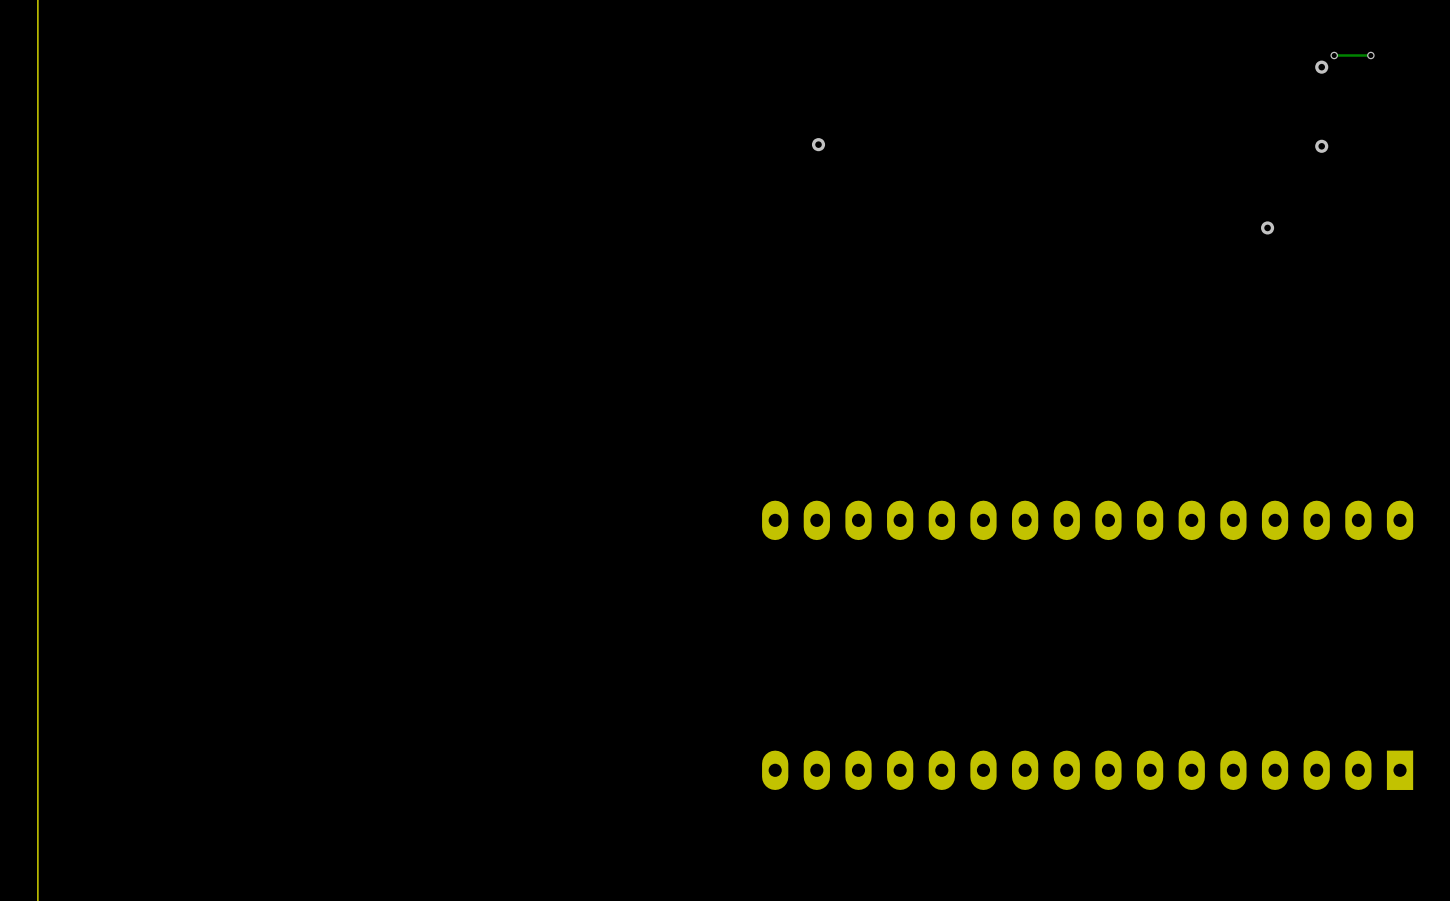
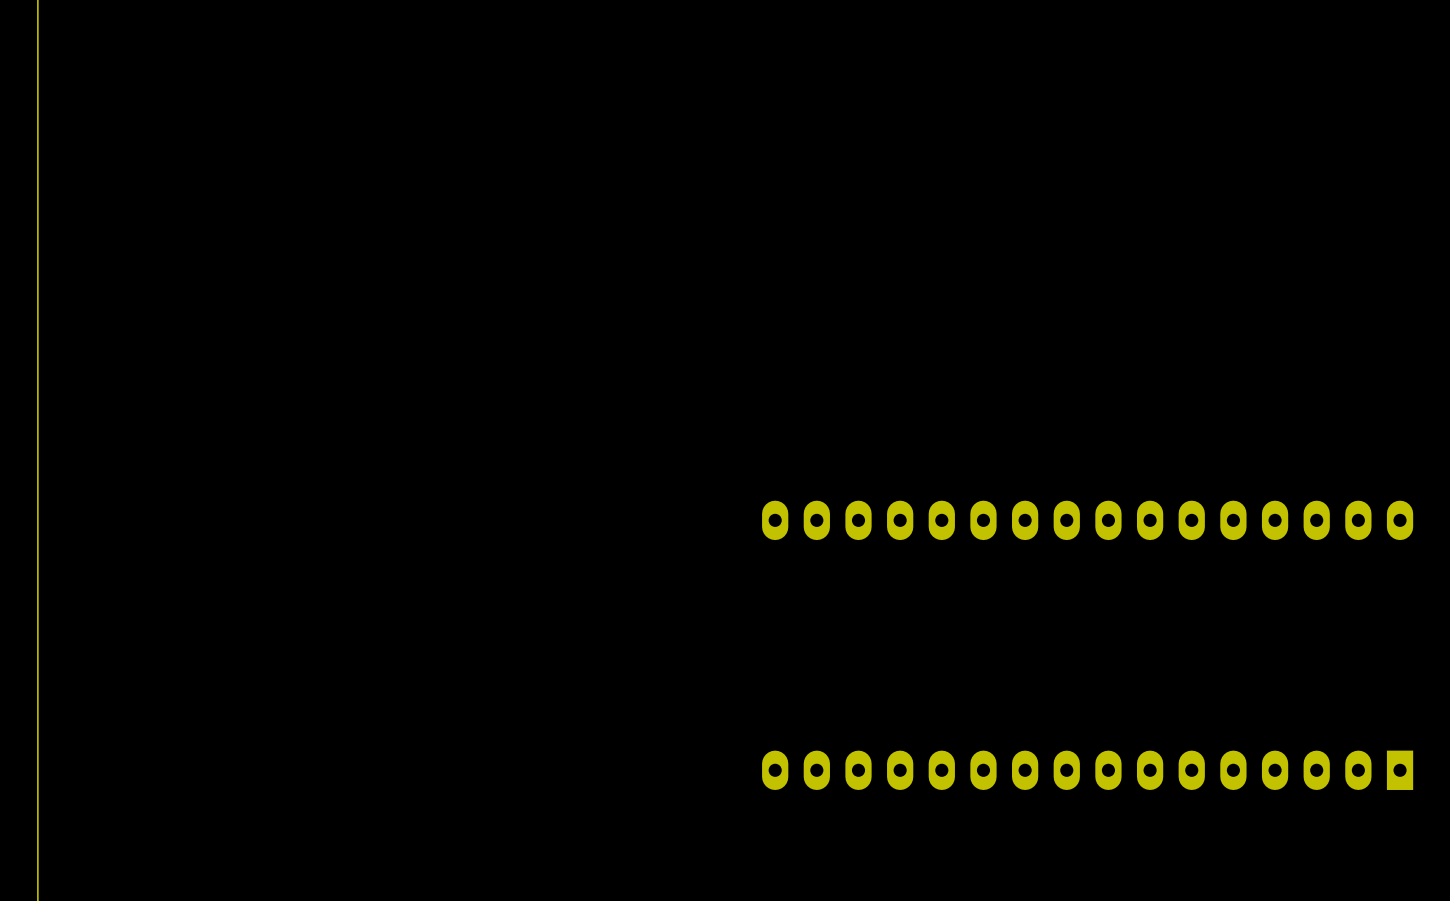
via: (1334, 55) -> none
track: (1370, 55) (1334, 55) -> none
via: (1370, 55) -> none
via: (1321, 67) -> none
via: (818, 144) -> none
via: (1321, 146) -> none
via: (1267, 227) -> none

